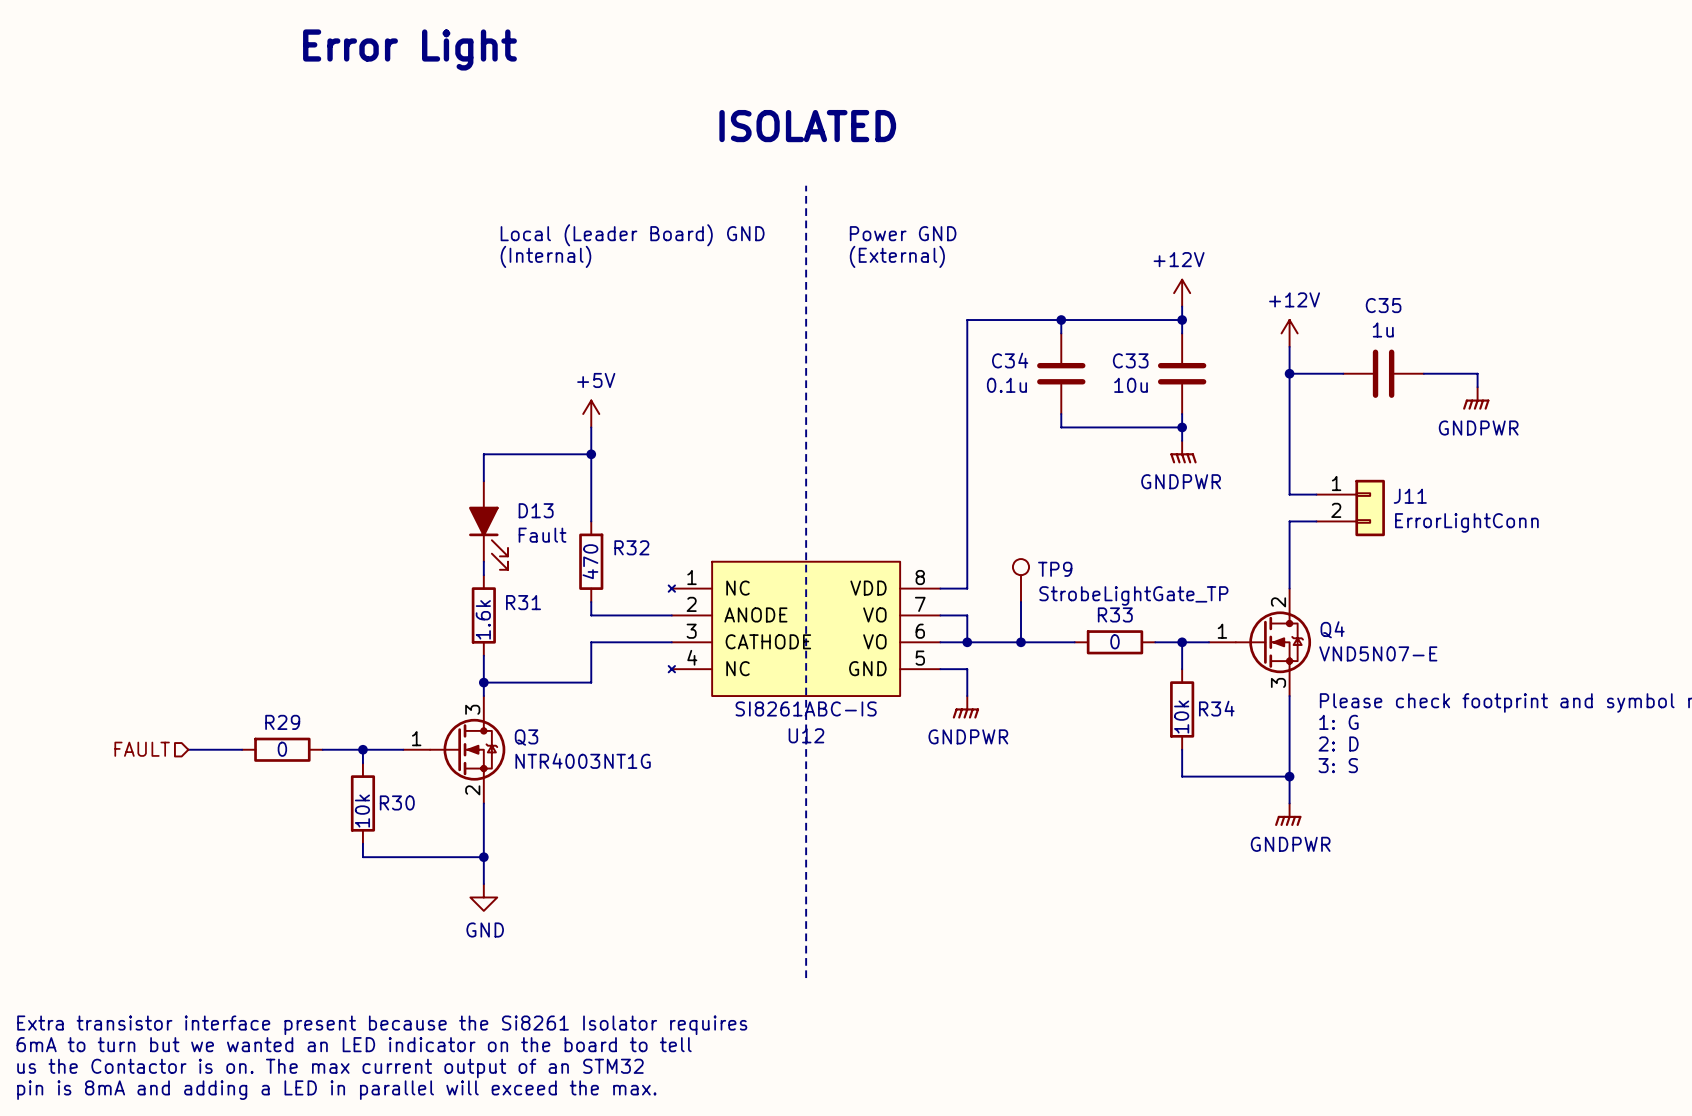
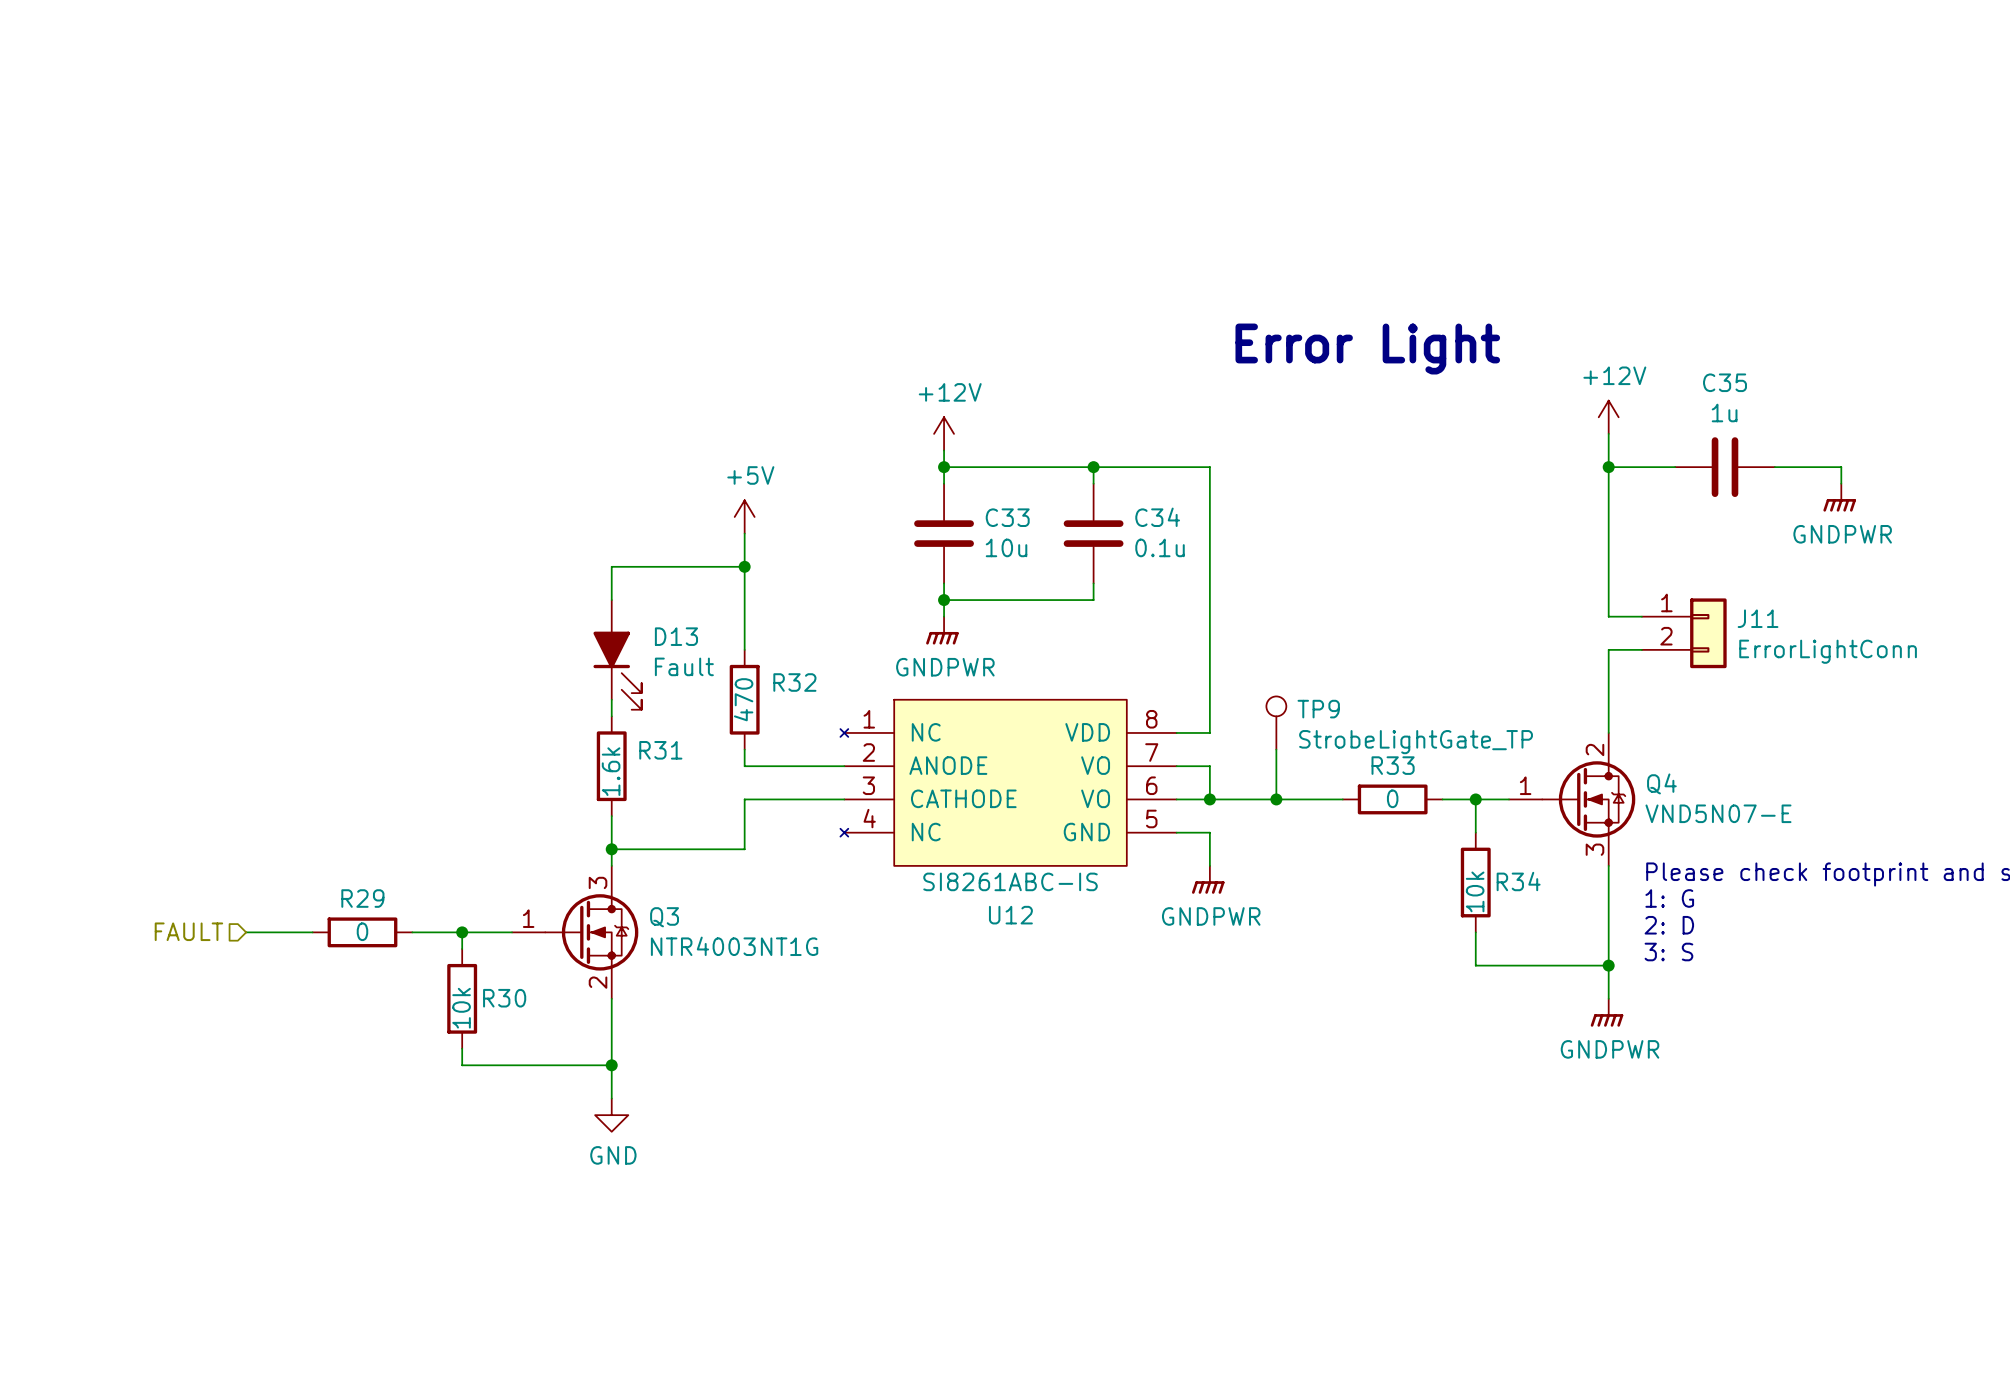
text: Error Light (409, 49) -> none
text: ISOLATED (807, 126) -> none
line: (806, 185) (806, 978) -> none
text: Power GND (903, 233) -> none
text: Local (Leader Board) GND (632, 235) -> none
text: (Internal) (545, 256) -> none
text: (External) (897, 256) -> none
text: none -> Error Light (1367, 349)
power symbol: +12V (1182, 293) -> none
wire: (1182, 306) (1182, 333) -> none
wire: (1061, 320) (1061, 333) -> (1093, 467) (1093, 483)
junction: (1061, 320) -> none
wire: (1182, 320) (967, 320) (967, 373) -> (944, 467) (1209, 467)
junction: (1182, 320) -> none
power symbol: none -> +12V (944, 433)
wire: none -> (944, 450) (944, 483)
C34 name position: C34 (1010, 360) -> C34 (1157, 517)
C33 name position: C33 (1130, 360) -> C33 (1007, 517)
junction: none -> (944, 467)
junction: none -> (1093, 467)
C34 position: (1061, 373) -> (1093, 533)
C33 position: (1182, 373) -> (944, 533)
C34 value position: 0.1u (1006, 385) -> 0.1u (1160, 547)
C33 value position: 10u (1131, 385) -> 10u (1006, 547)
wire: (1061, 414) (1061, 427) (1182, 427) -> none
wire: (1182, 414) (1182, 440) -> none
junction: (1182, 427) -> none
power symbol: GNDPWR (1183, 452) -> none
wire: none -> (944, 583) (944, 616)
wire: none -> (1093, 583) (1093, 600) (944, 600)
junction: none -> (944, 600)
power symbol: none -> GNDPWR (942, 630)
text: Extra transistor interface present because the Si8261 Isolator requires (382, 1025) -> none
text: 6mA to turn but we wanted an LED indicator on the board to tell (354, 1044) -> none
text: us the Contactor is on. The max current output of an STM32 (330, 1068) -> none
text: pin is 8mA and adding a LED in parallel will exceed the max. (336, 1090) -> none

